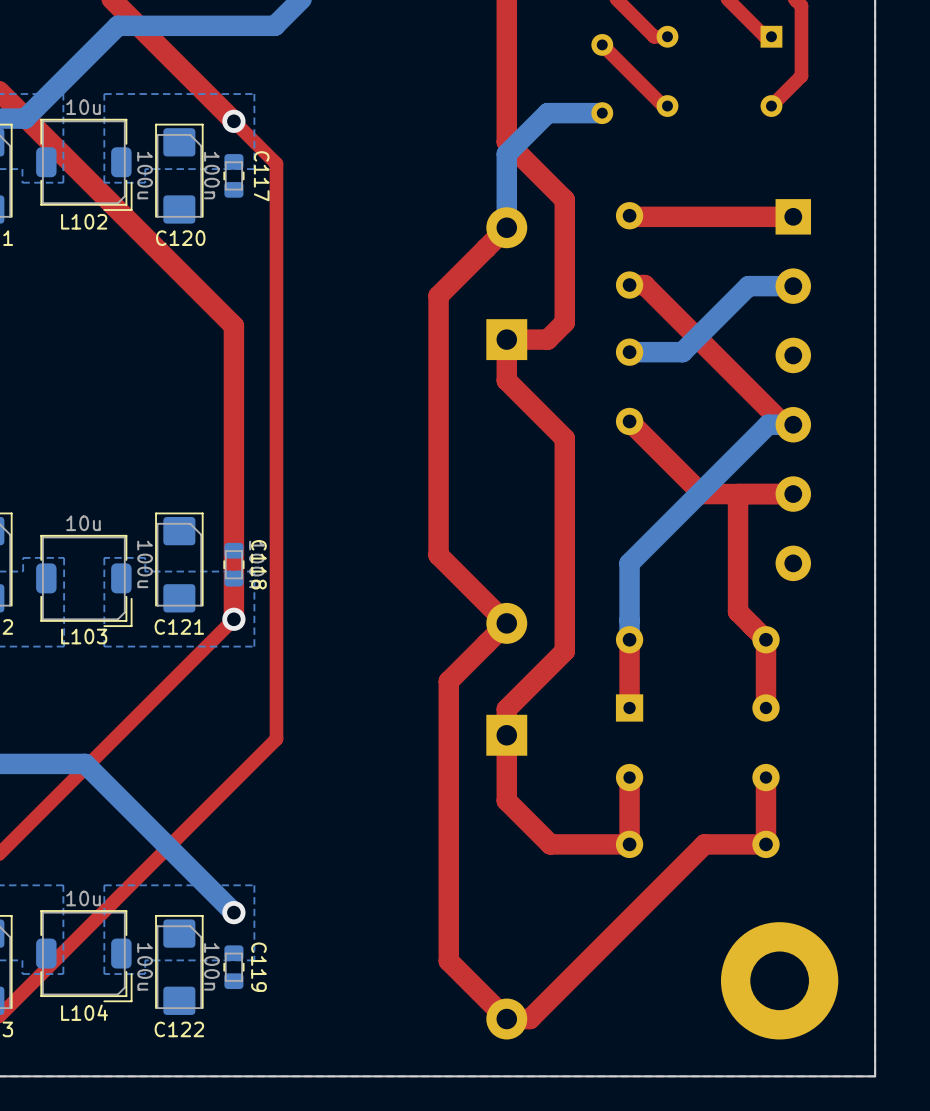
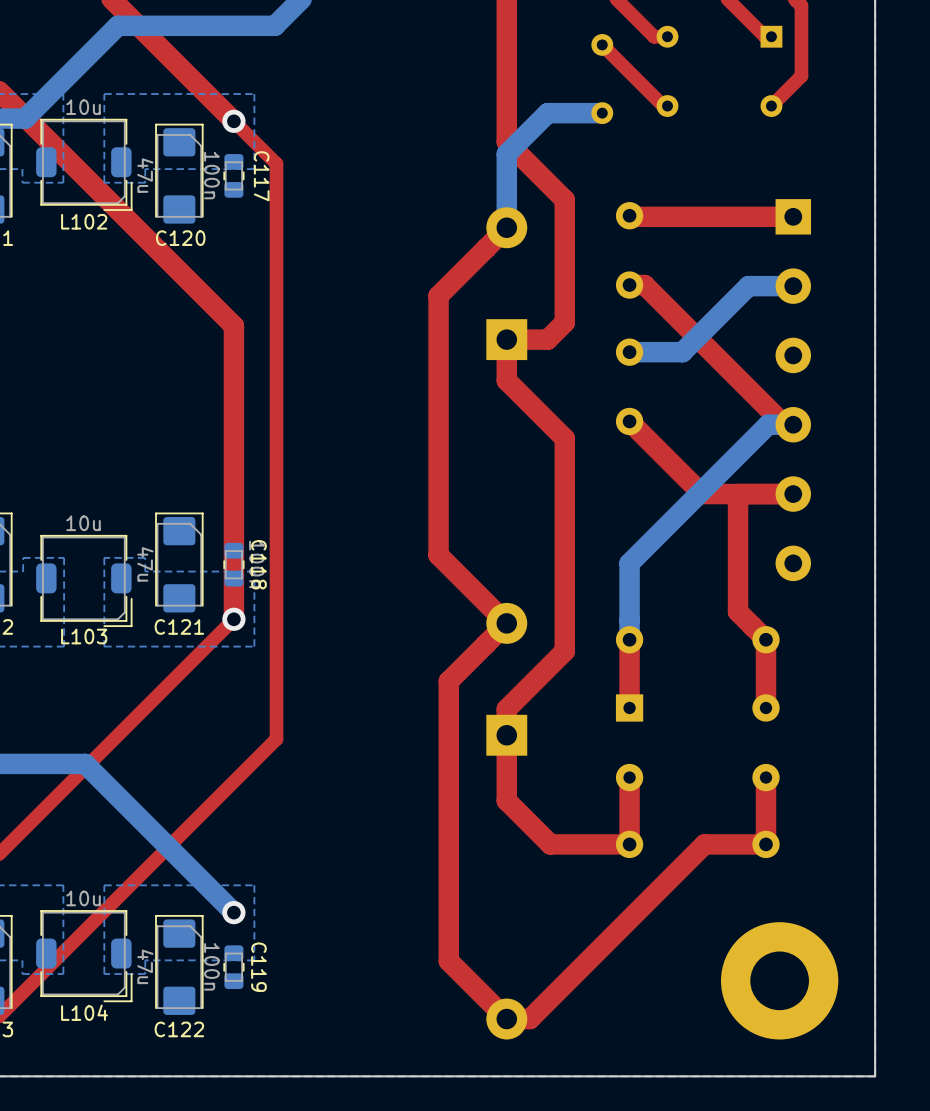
C120 value: 100u (145, 175) -> 47u (145, 175)
C121 value: 100u (145, 564) -> 47u (145, 564)
C122 value: 100u (145, 966) -> 47u (145, 966)

